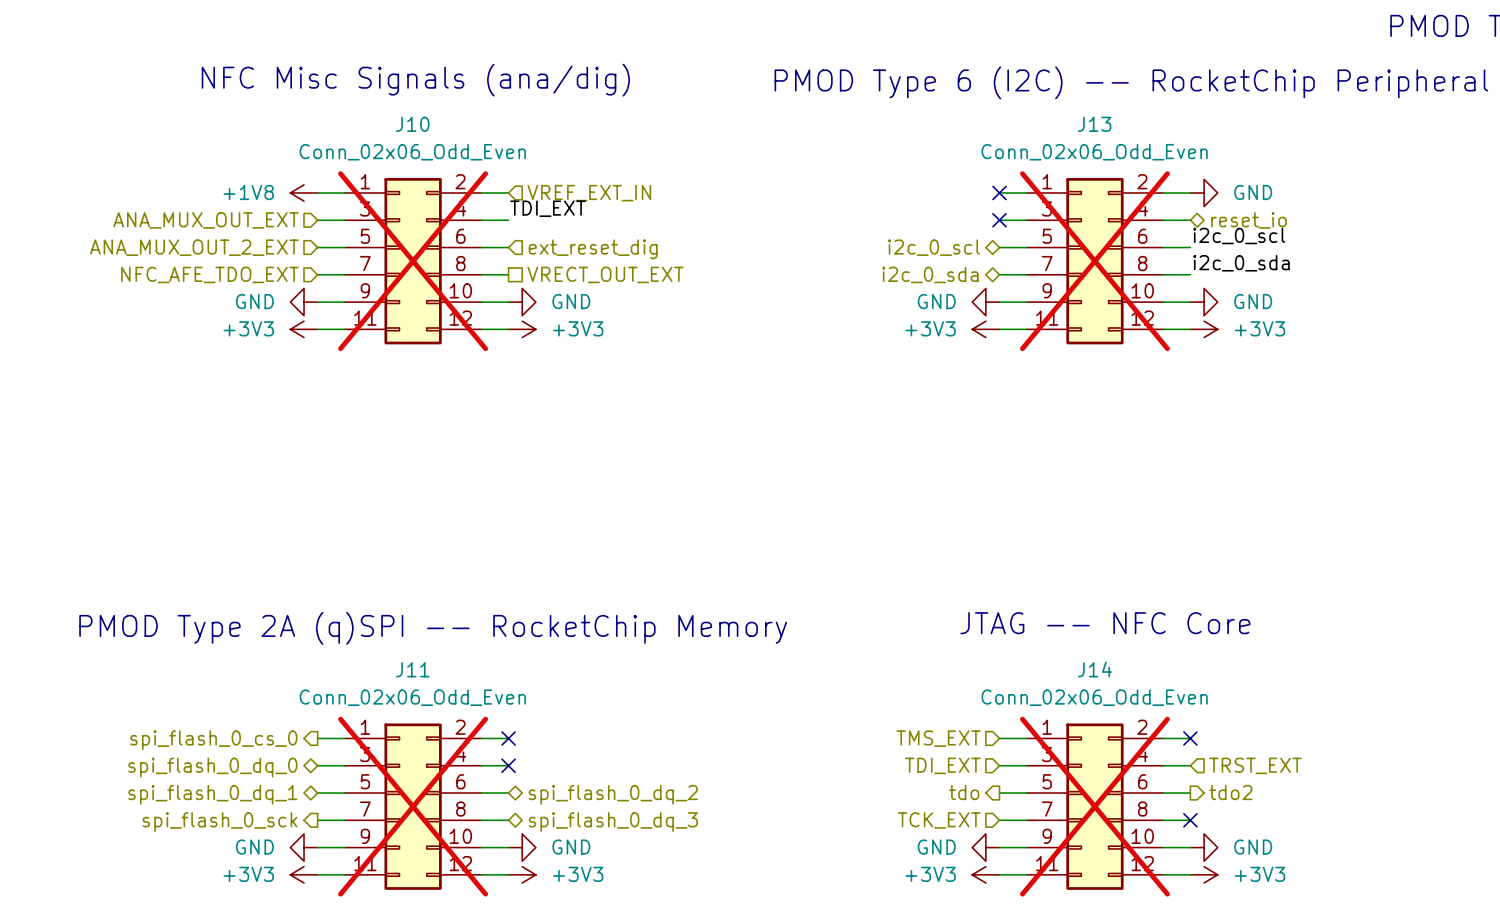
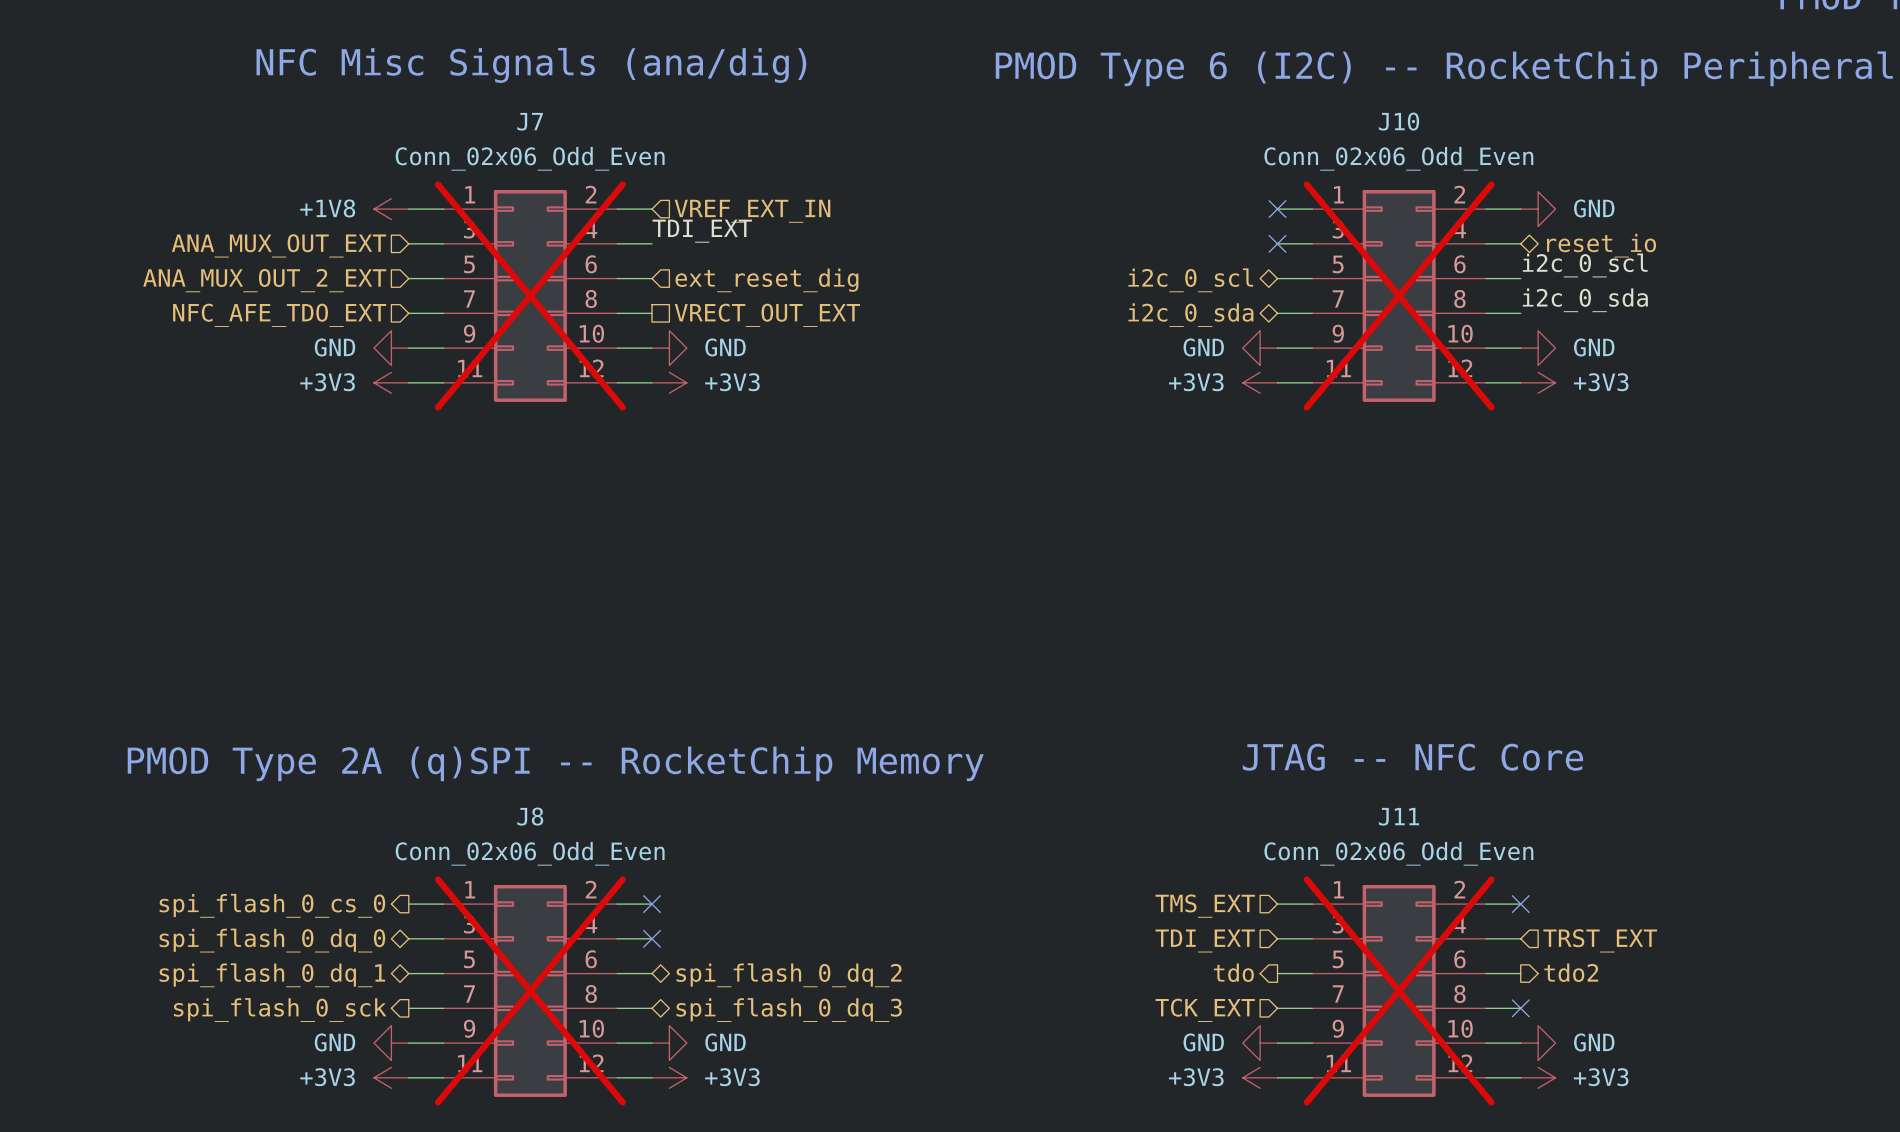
J10 name: J10 (412, 124) -> J7 (530, 121)
J13 name: J13 (1094, 124) -> J10 (1398, 121)
J11 name: J11 (412, 669) -> J8 (530, 816)
J14 name: J14 (1094, 669) -> J11 (1398, 816)

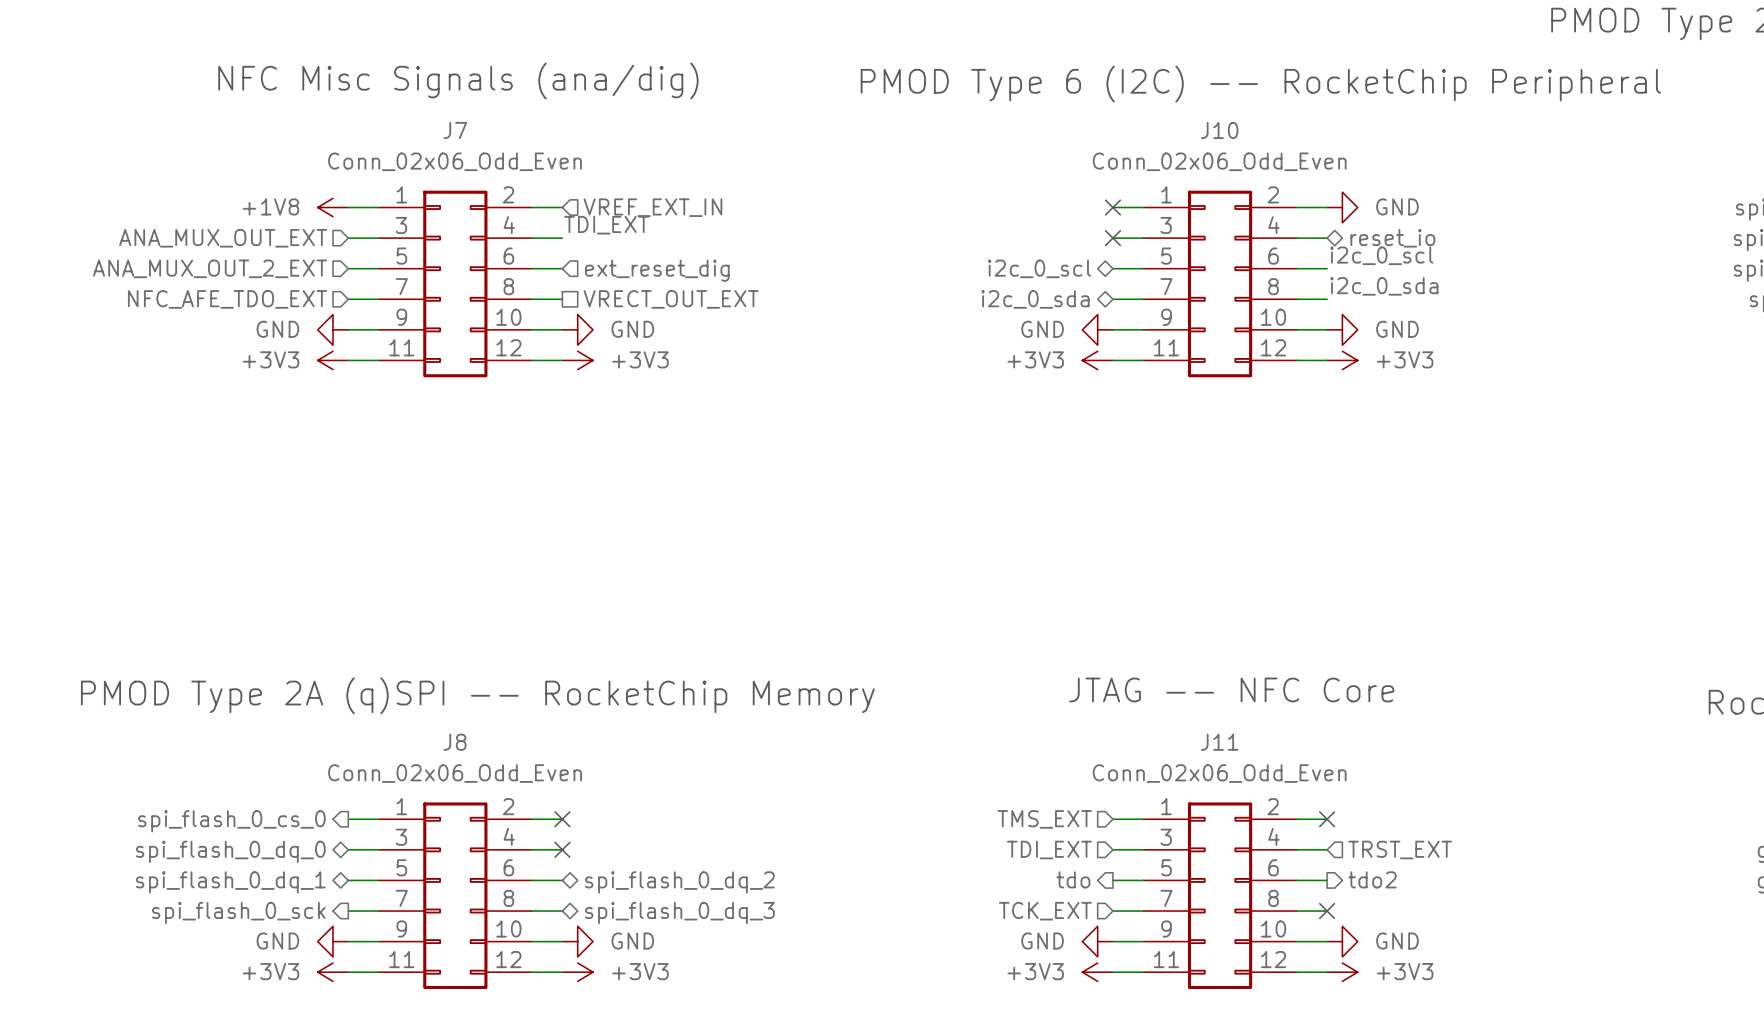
J7 do-not-place cross: (530, 295) -> none
J10 do-not-place cross: (1399, 295) -> none
J8 do-not-place cross: (530, 990) -> none
J11 do-not-place cross: (1399, 990) -> none

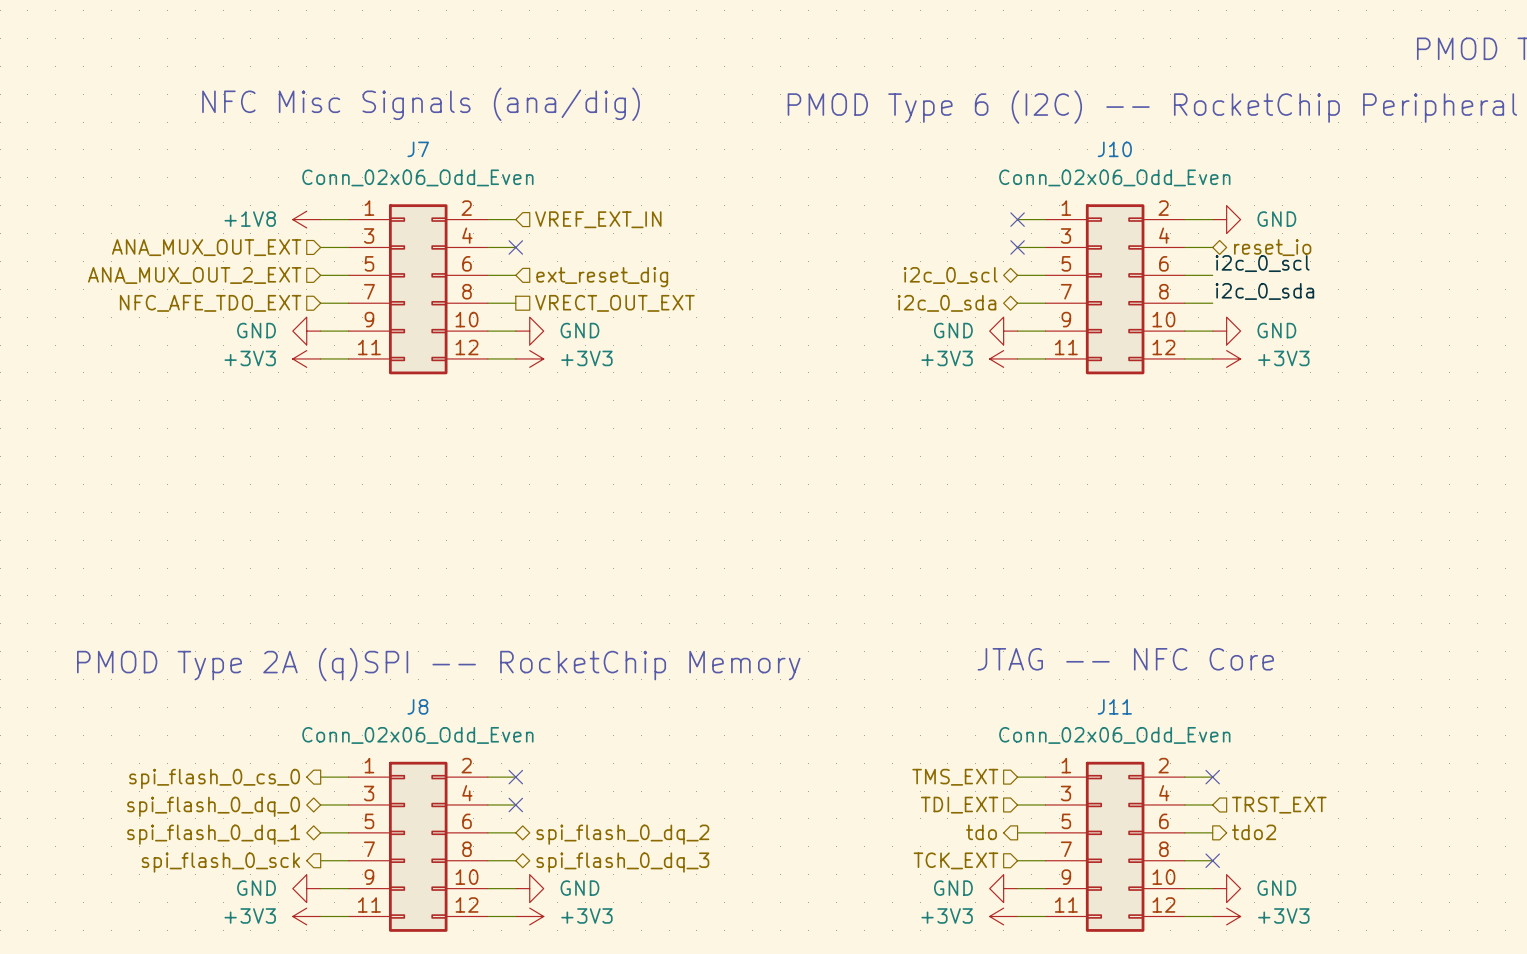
label: TDI_EXT (606, 225) -> none
no-connect mark: none -> (515, 247)

